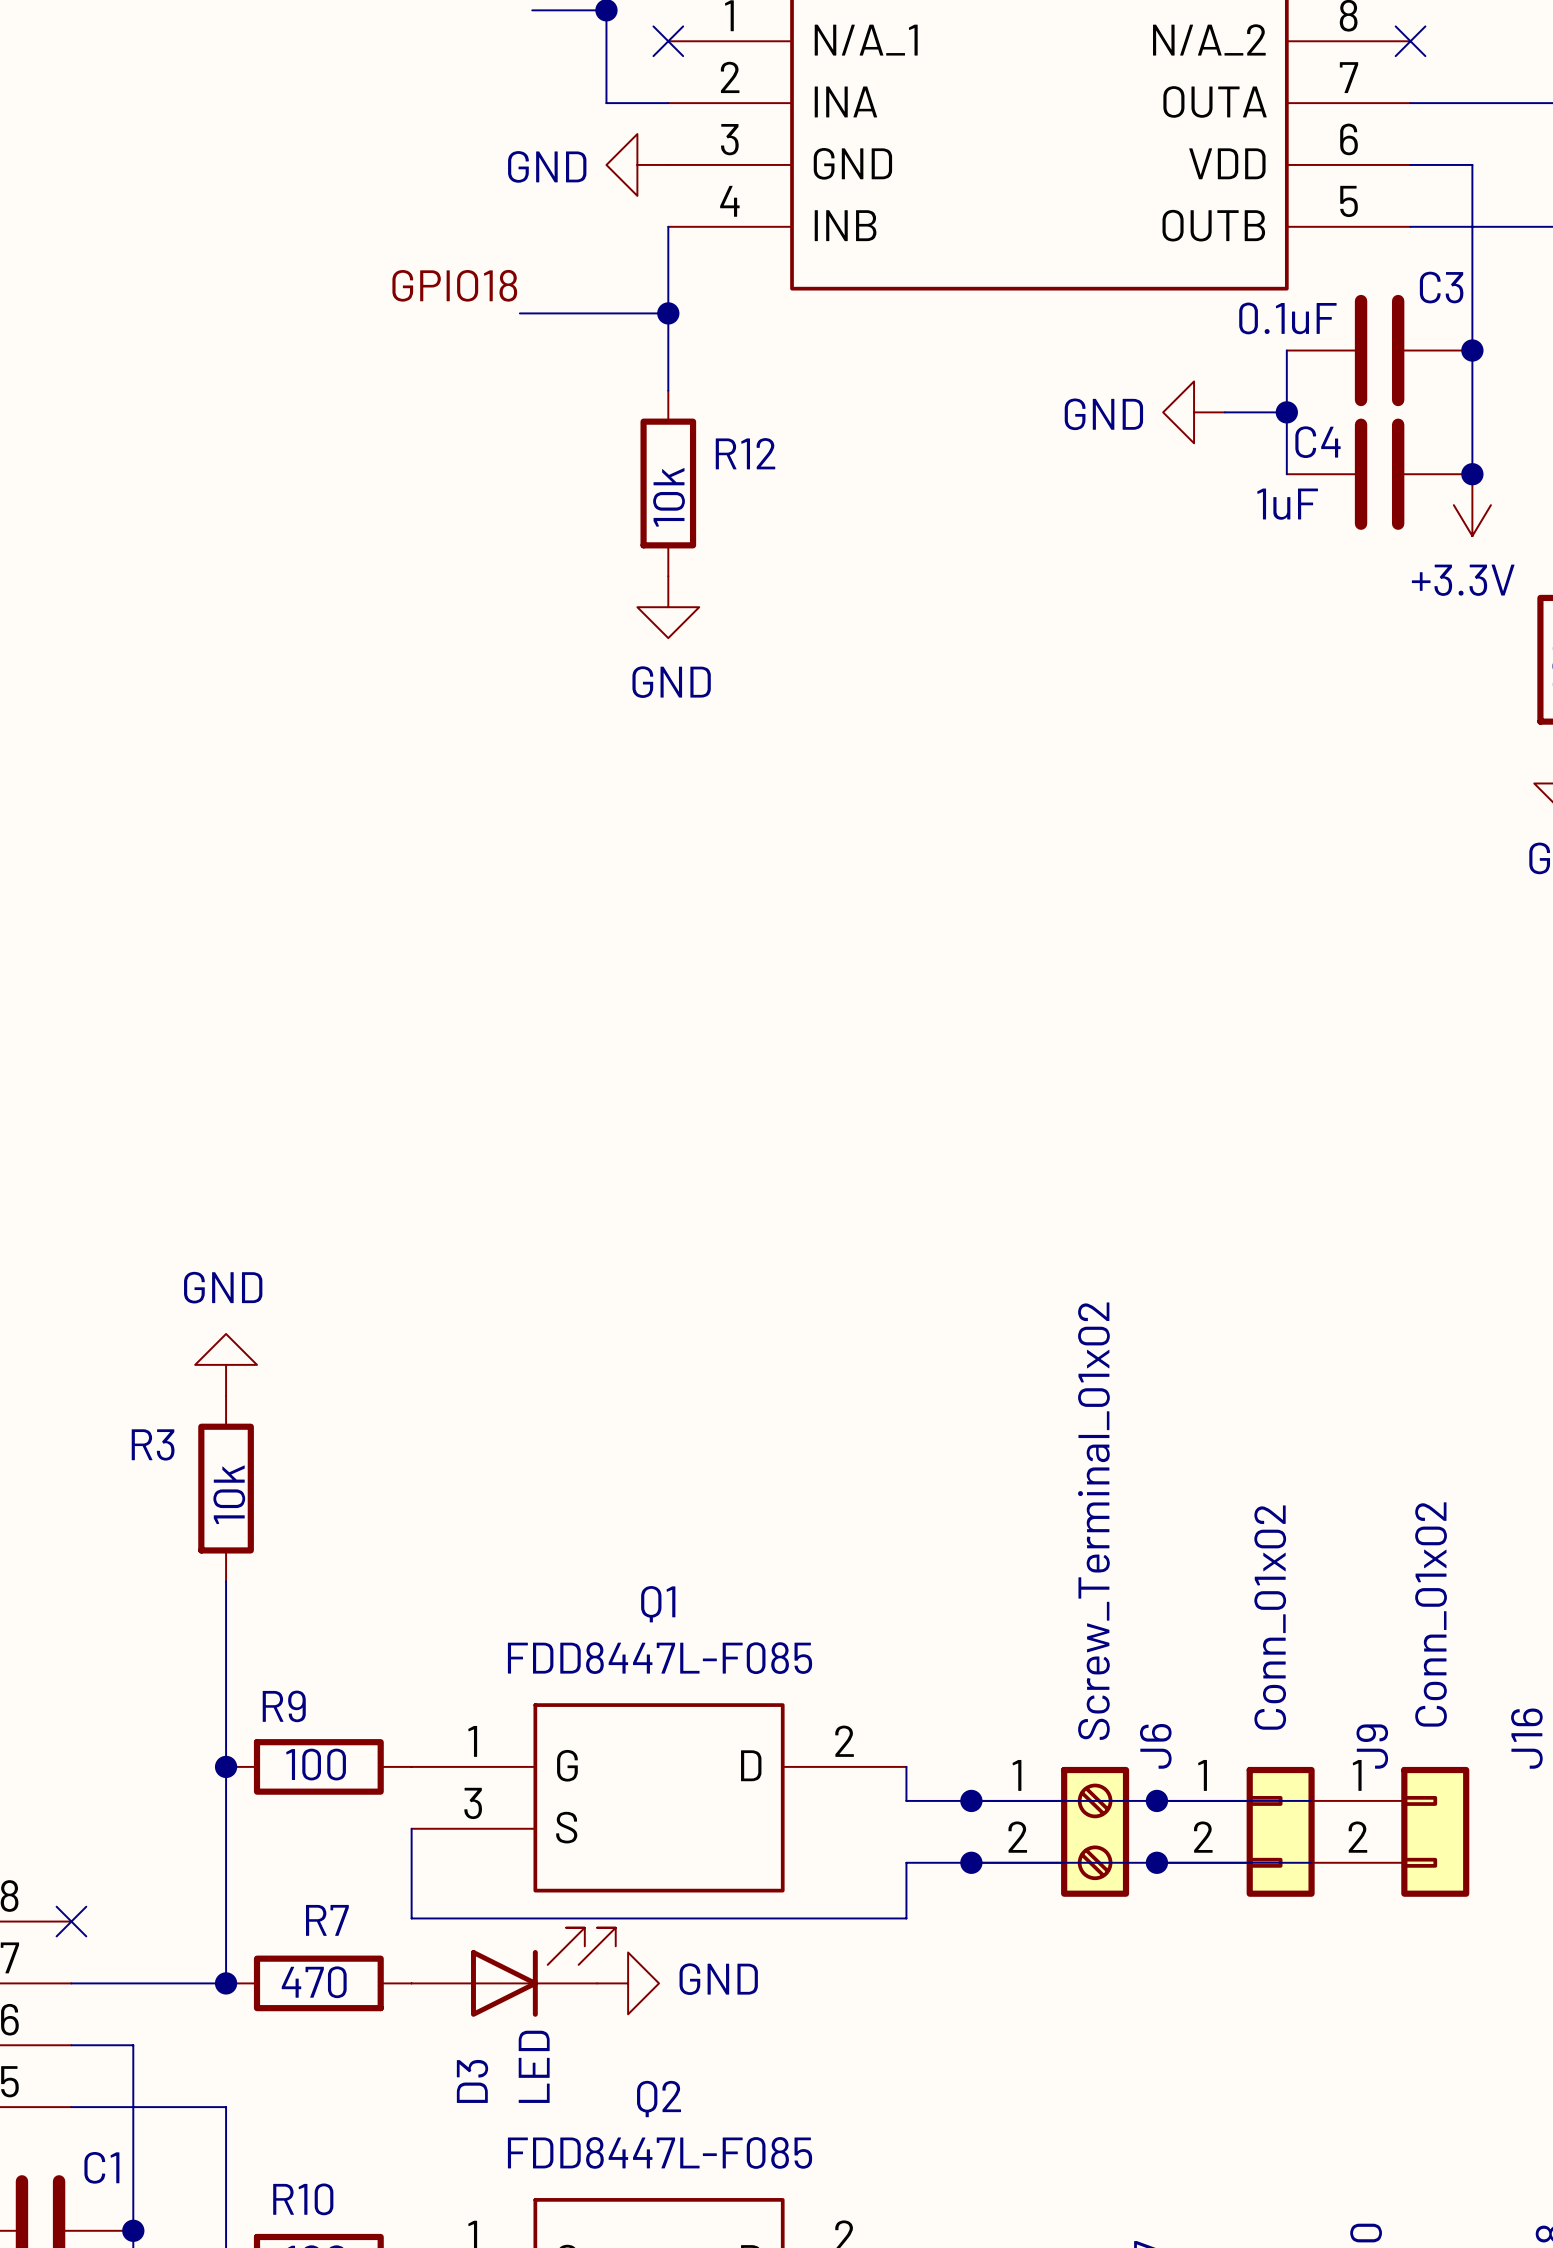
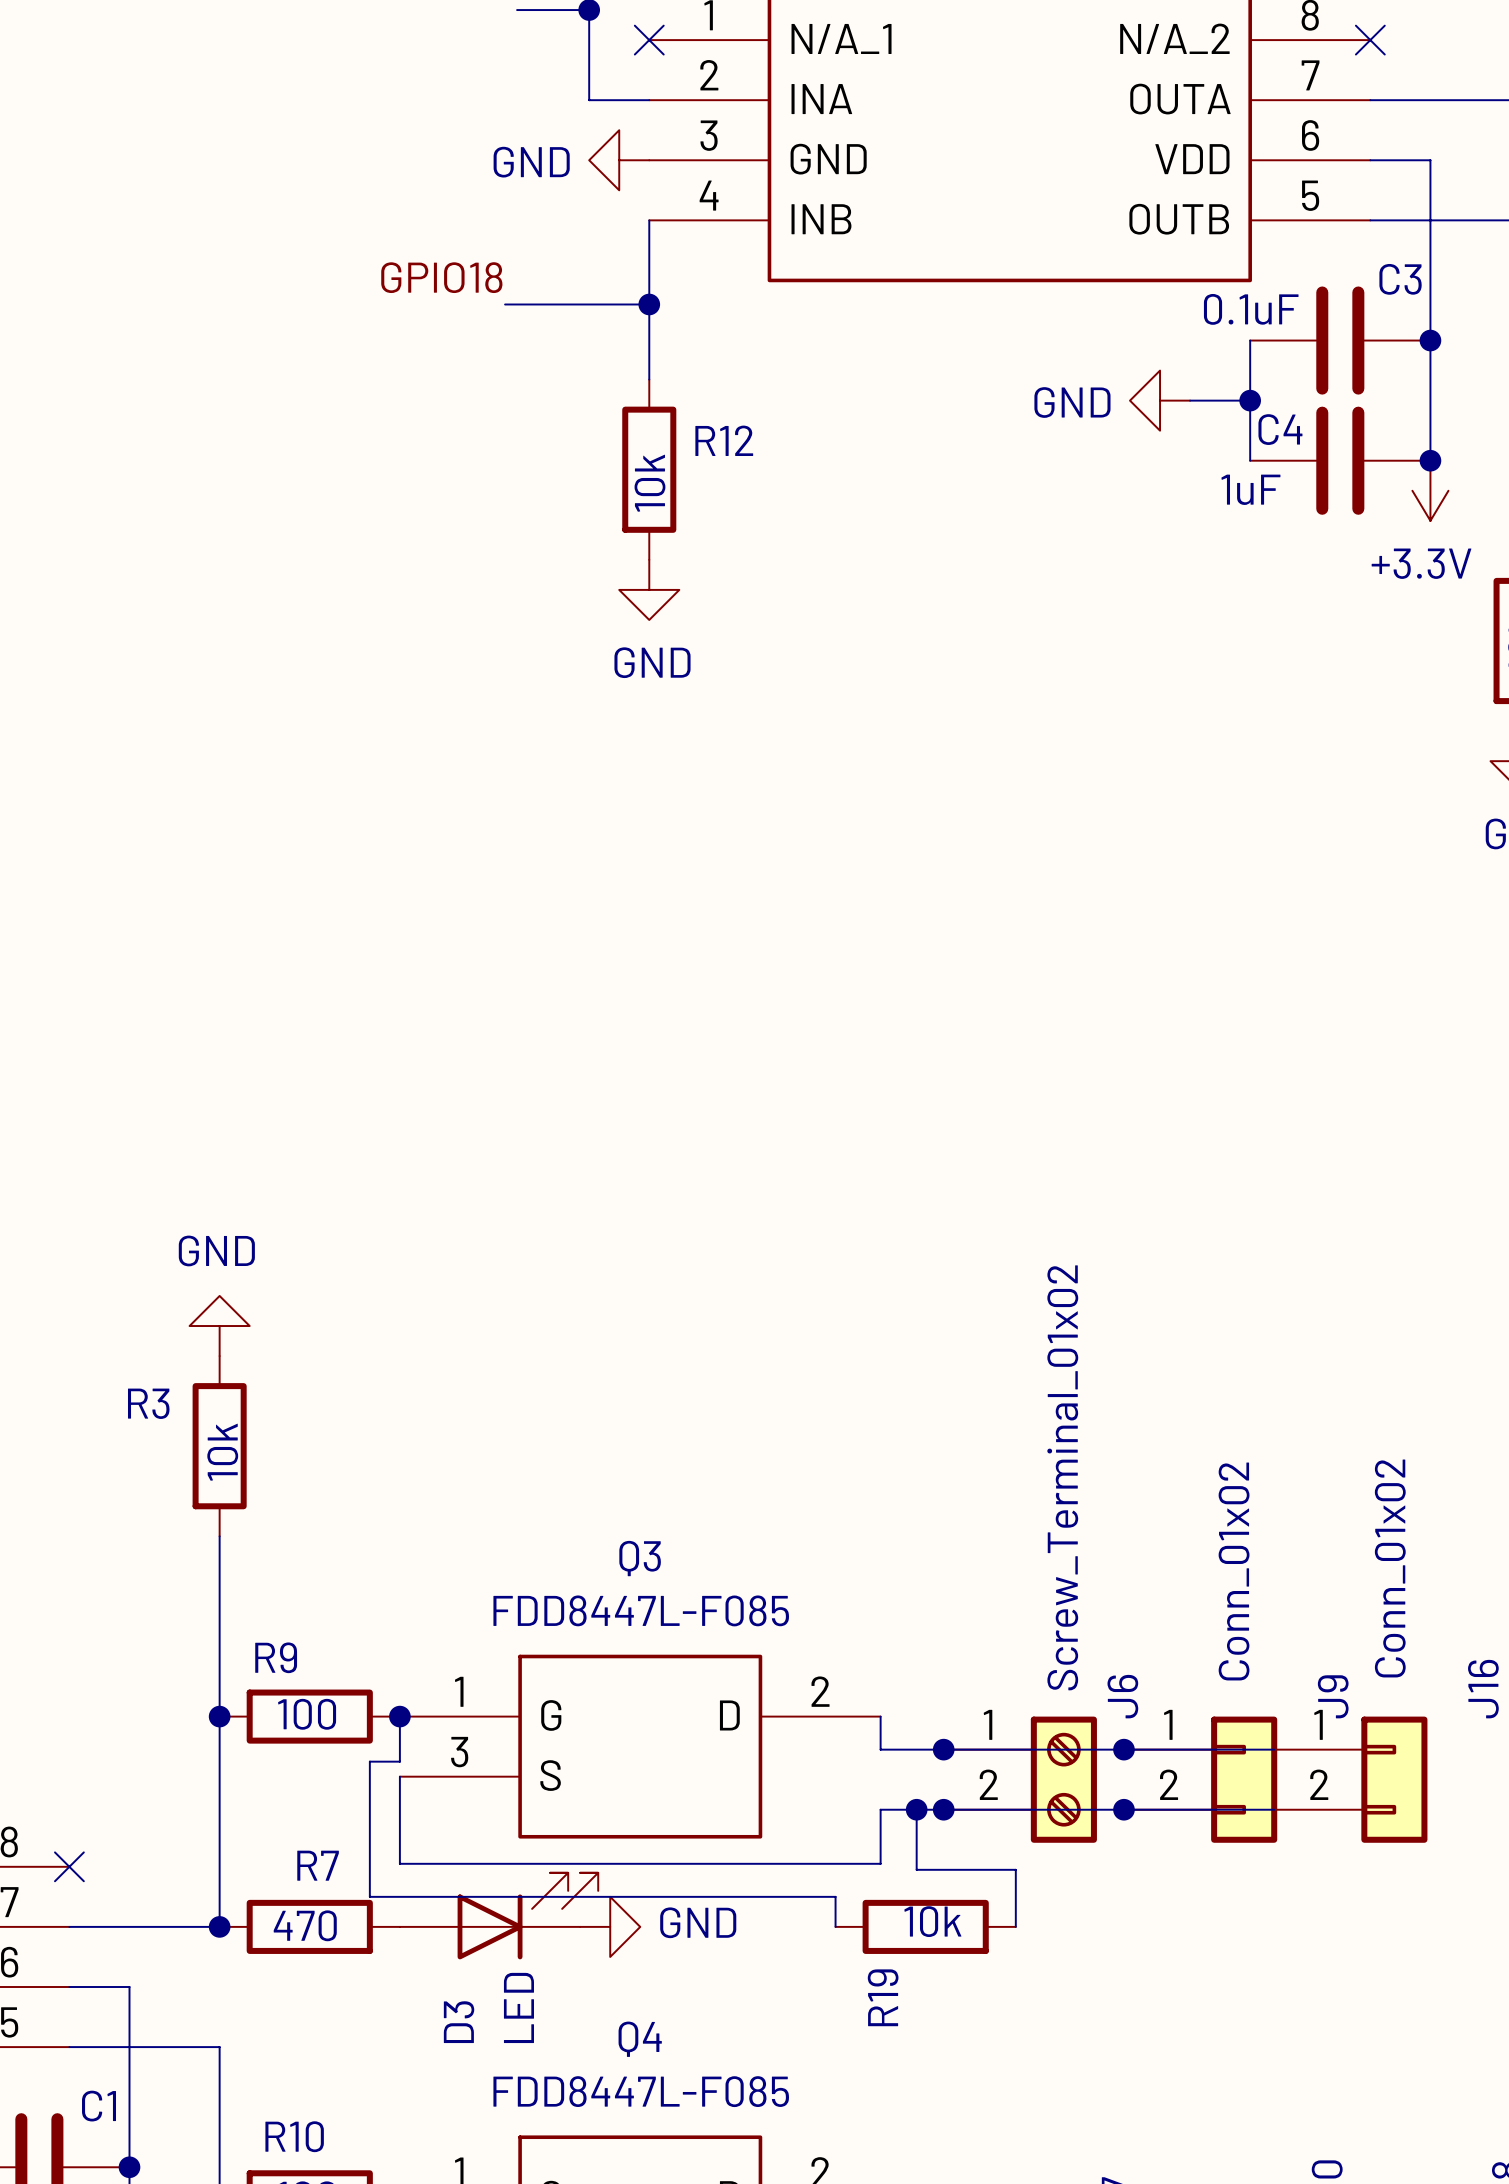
Q1 name: Q1 (658, 1604) -> Q3 (640, 1558)
wire: none -> (399, 1716) (399, 1761) (369, 1761) (369, 1896) (835, 1896) (835, 1926)
junction: none -> (399, 1716)
wire: none -> (916, 1809) (916, 1869) (1015, 1869) (1015, 1926)
junction: none -> (916, 1809)
R19: none -> 10k (925, 1926)
Q2 name: Q2 (659, 2099) -> Q4 (640, 2039)

